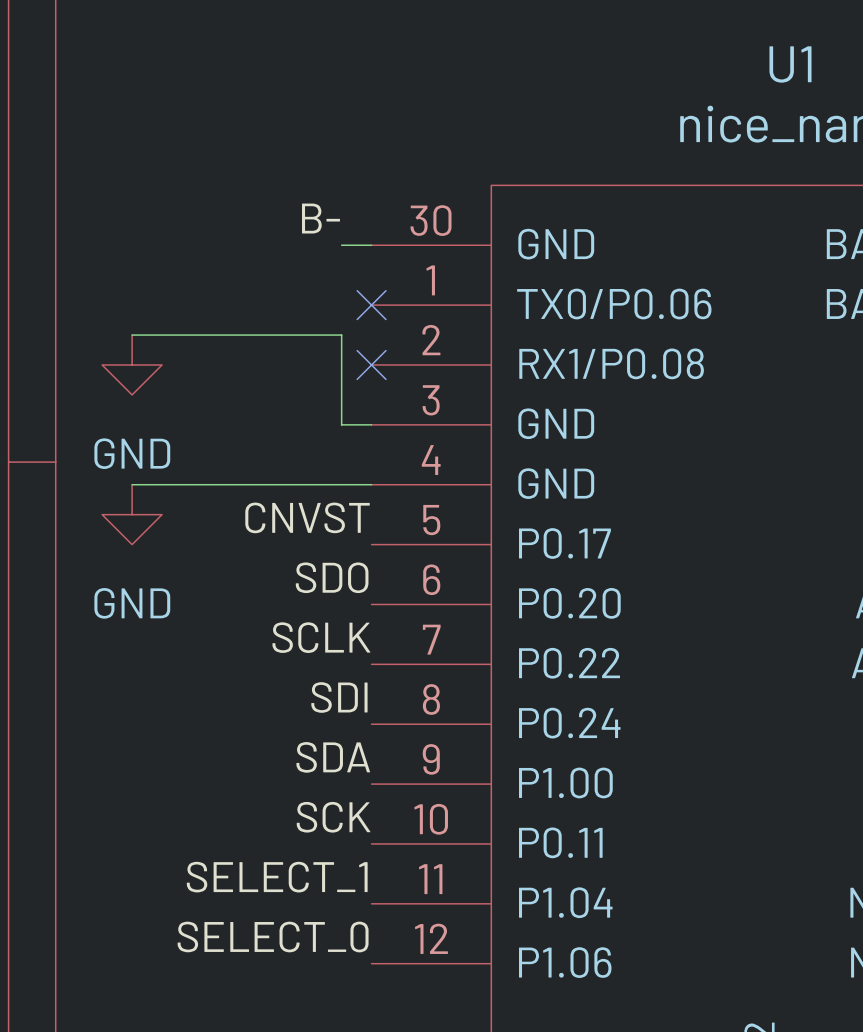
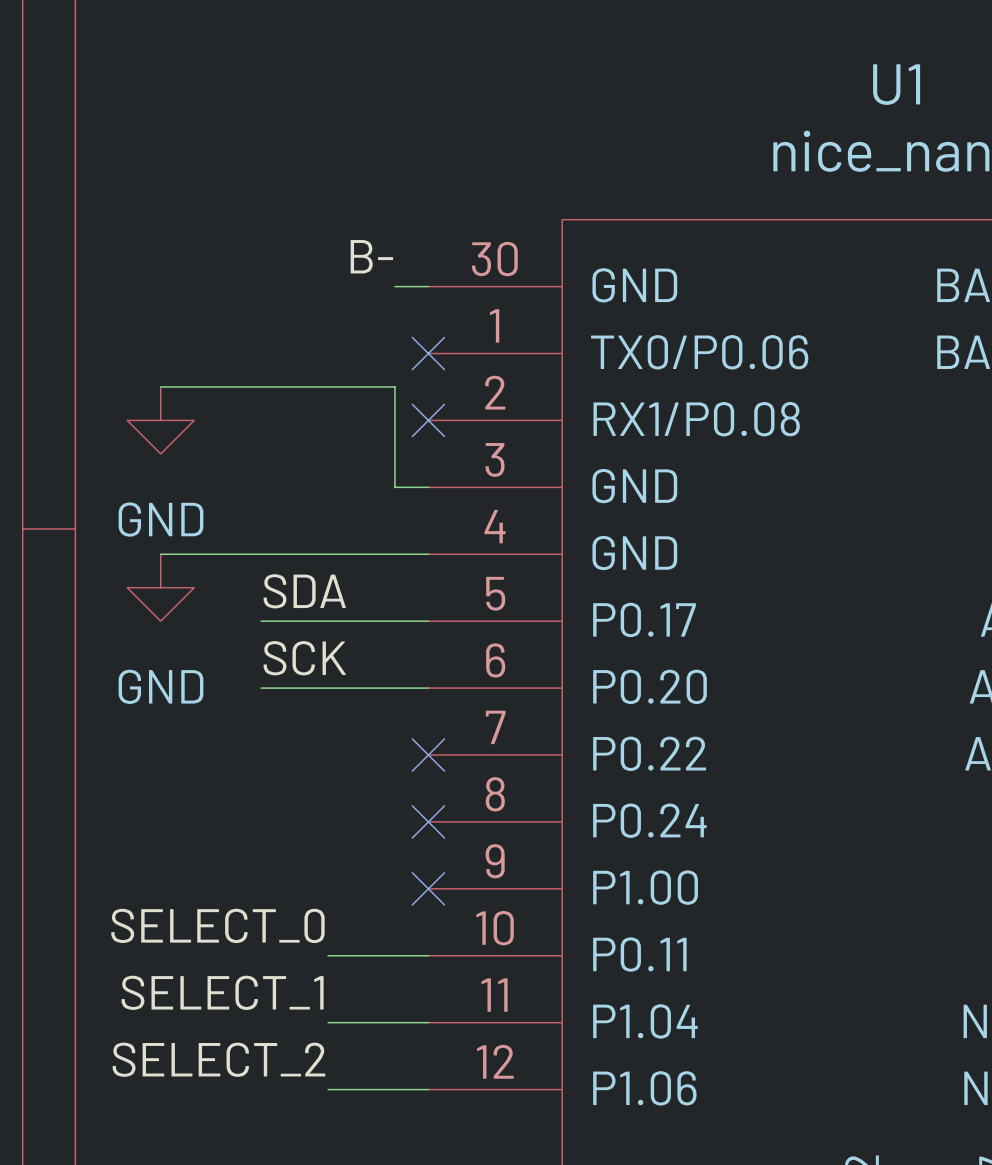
label: CNVST (307, 517) -> none
wire: none -> (261, 621) (428, 621)
label: SDO (332, 577) -> none
wire: none -> (261, 688) (428, 688)
label: SCLK (321, 637) -> none
no-connect mark: none -> (428, 755)
label: SDI (339, 697) -> none
no-connect mark: none -> (428, 821)
label position: SDA (333, 757) -> SDA (304, 591)
no-connect mark: none -> (428, 888)
label position: SCK (333, 817) -> SCK (304, 658)
wire: none -> (328, 955) (428, 955)
label position: SELECT_1 (277, 877) -> SELECT_1 (222, 992)
wire: none -> (328, 1022) (428, 1022)
label: none -> SELECT_2 (218, 1059)
label position: SELECT_0 (273, 937) -> SELECT_0 (217, 925)
wire: none -> (328, 1089) (428, 1089)

